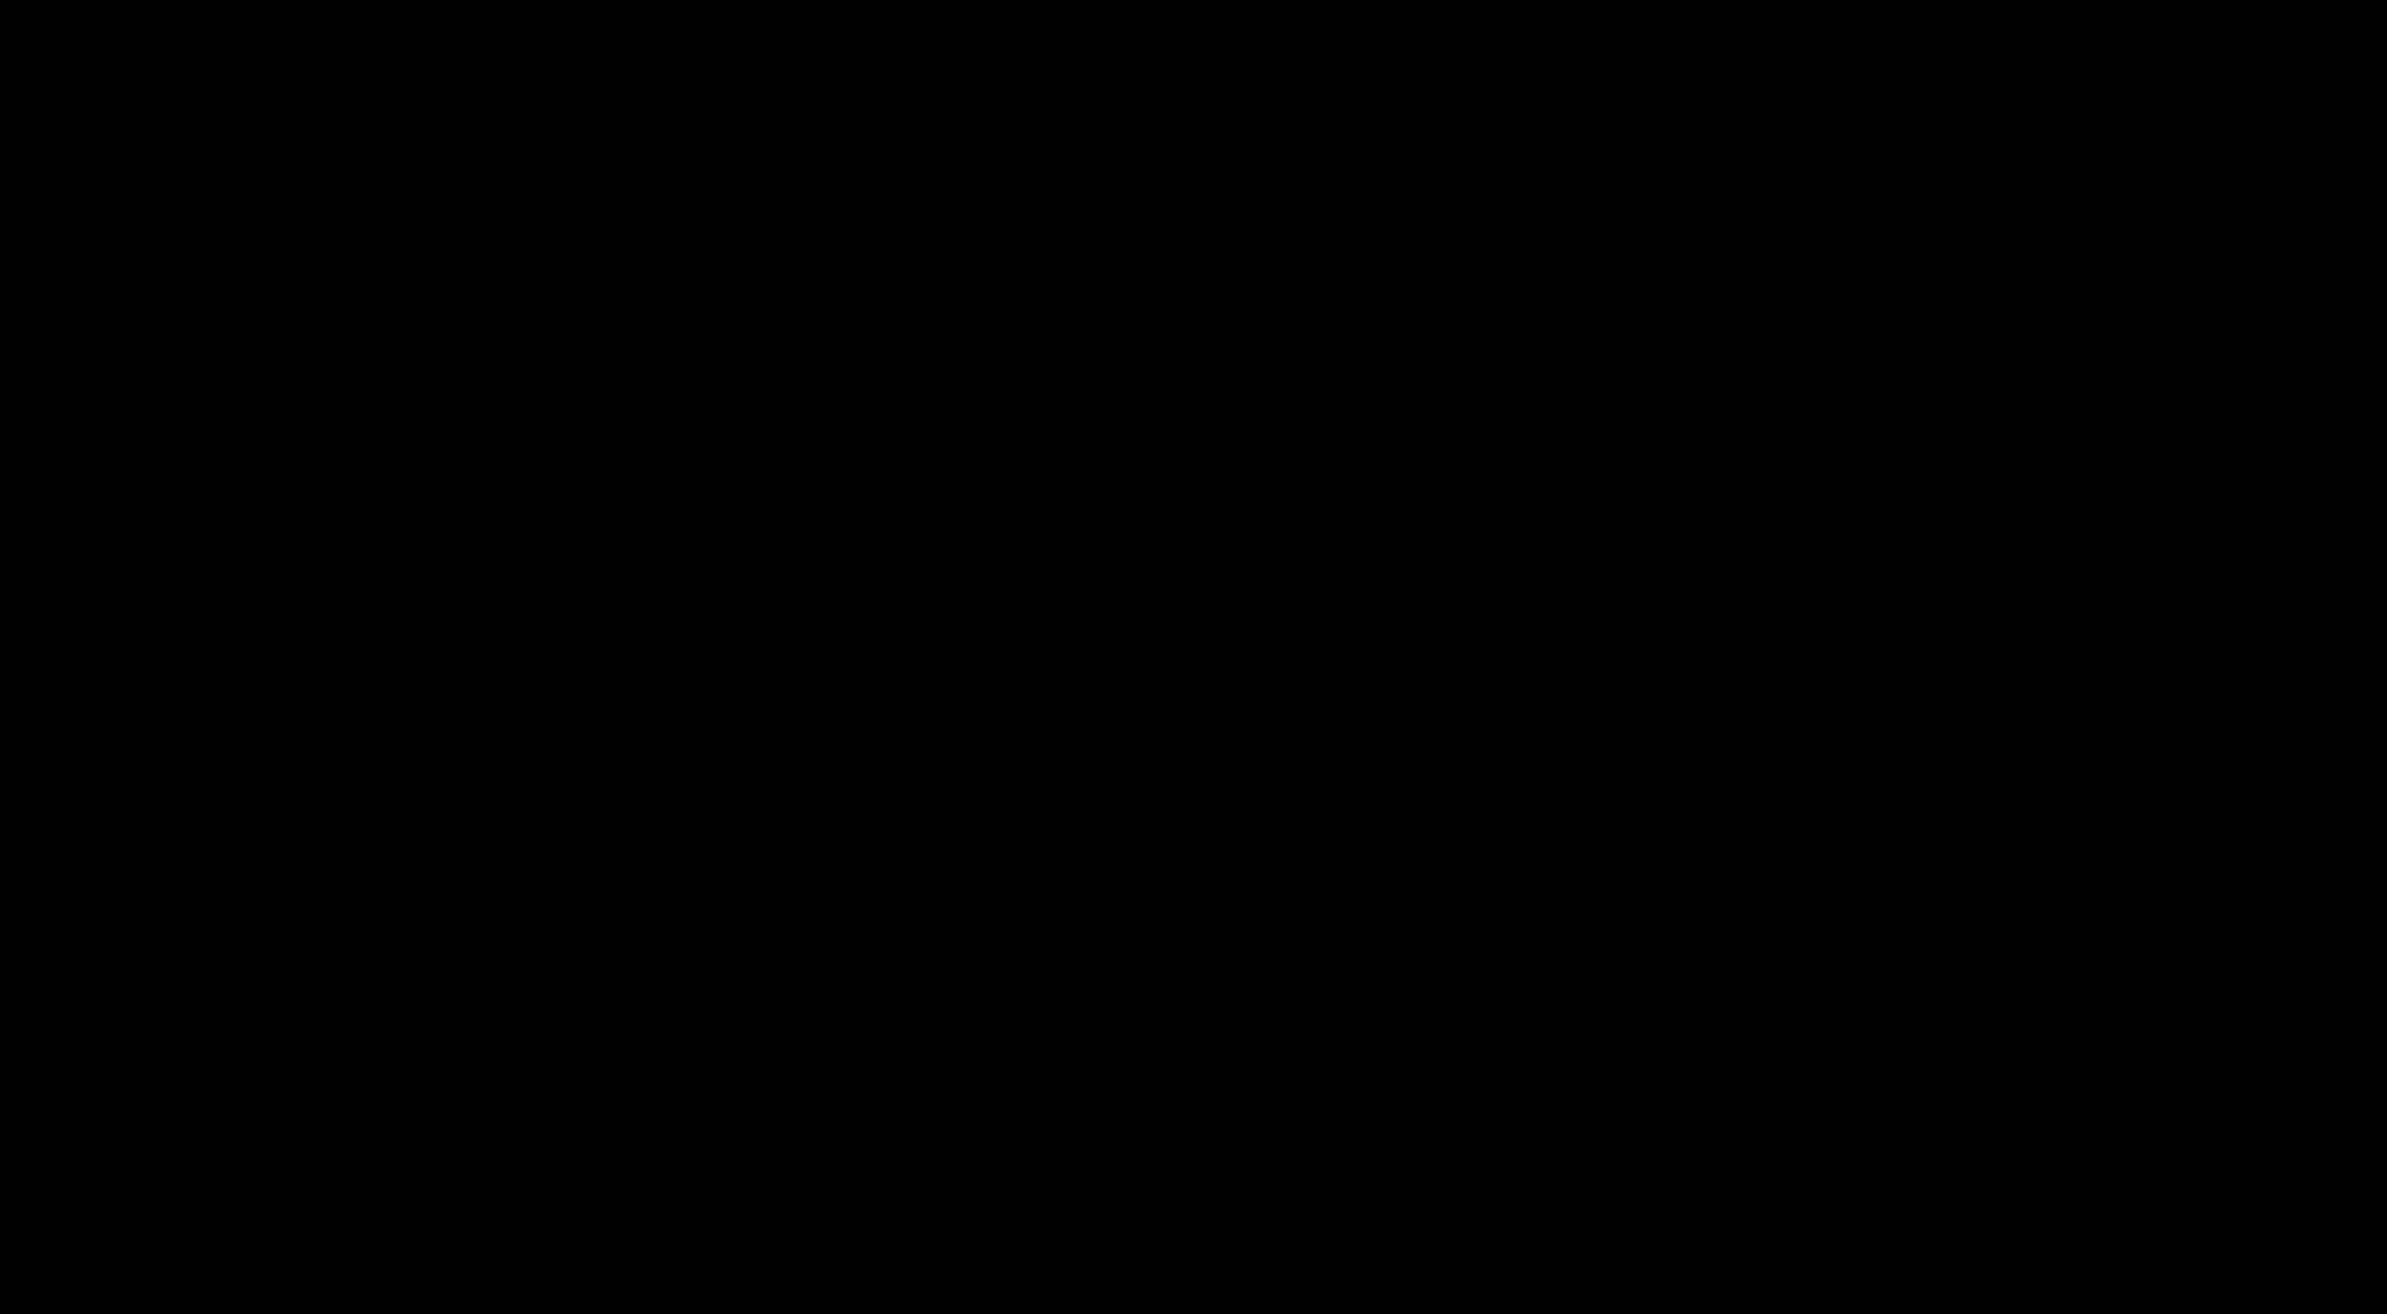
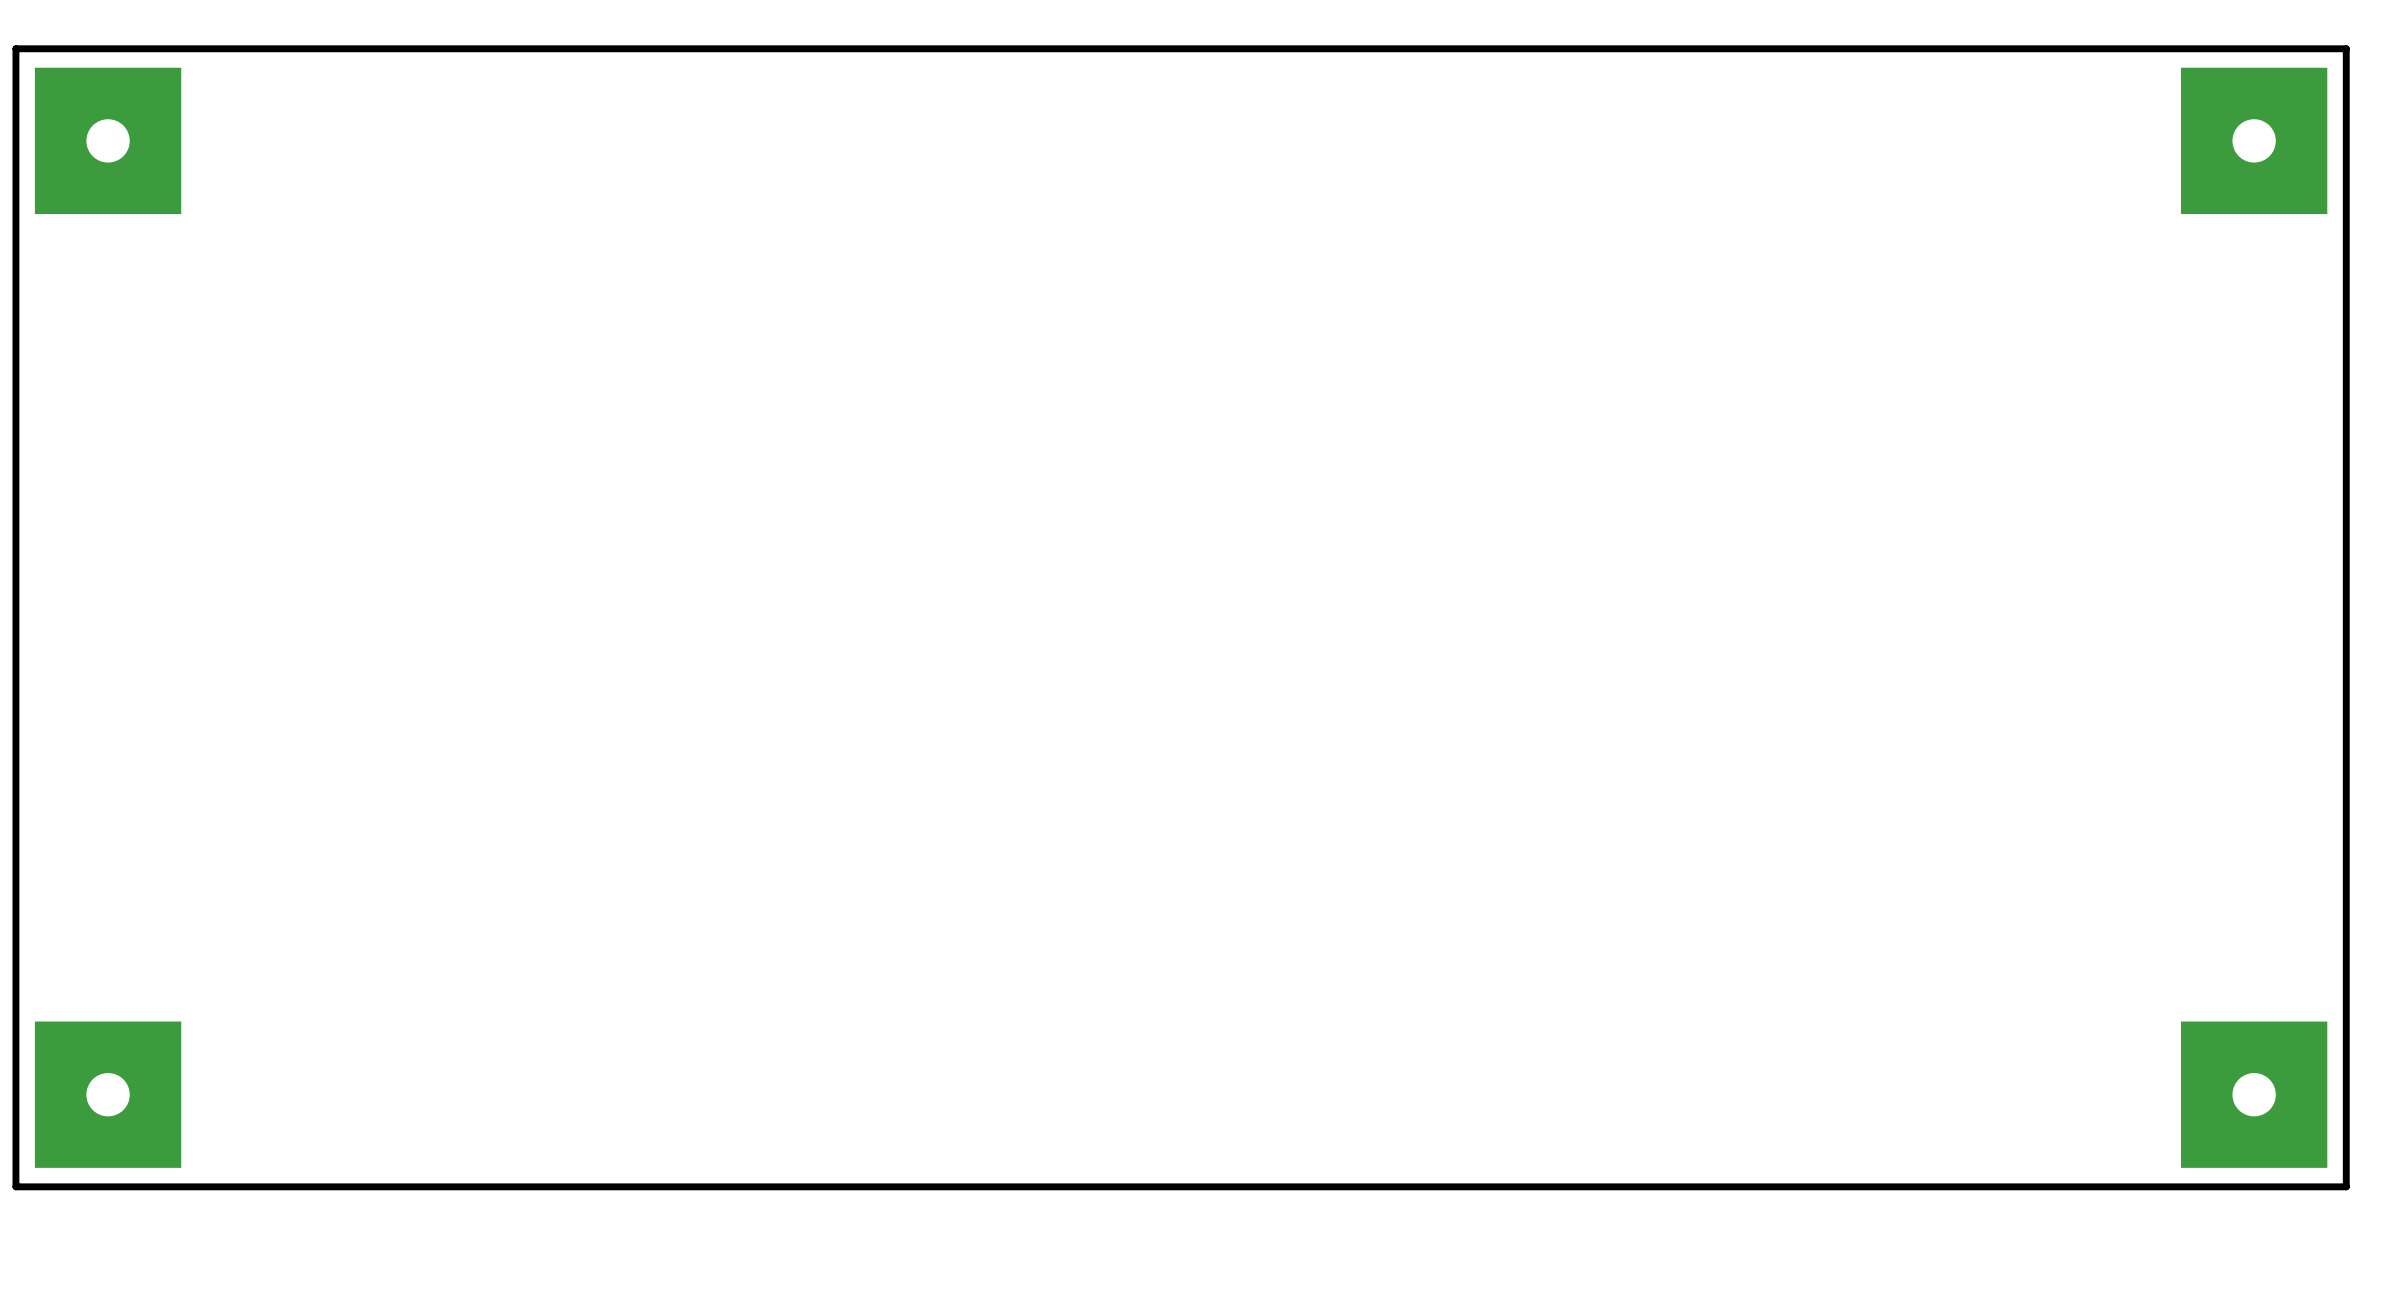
part: none -> (1181, 617)

